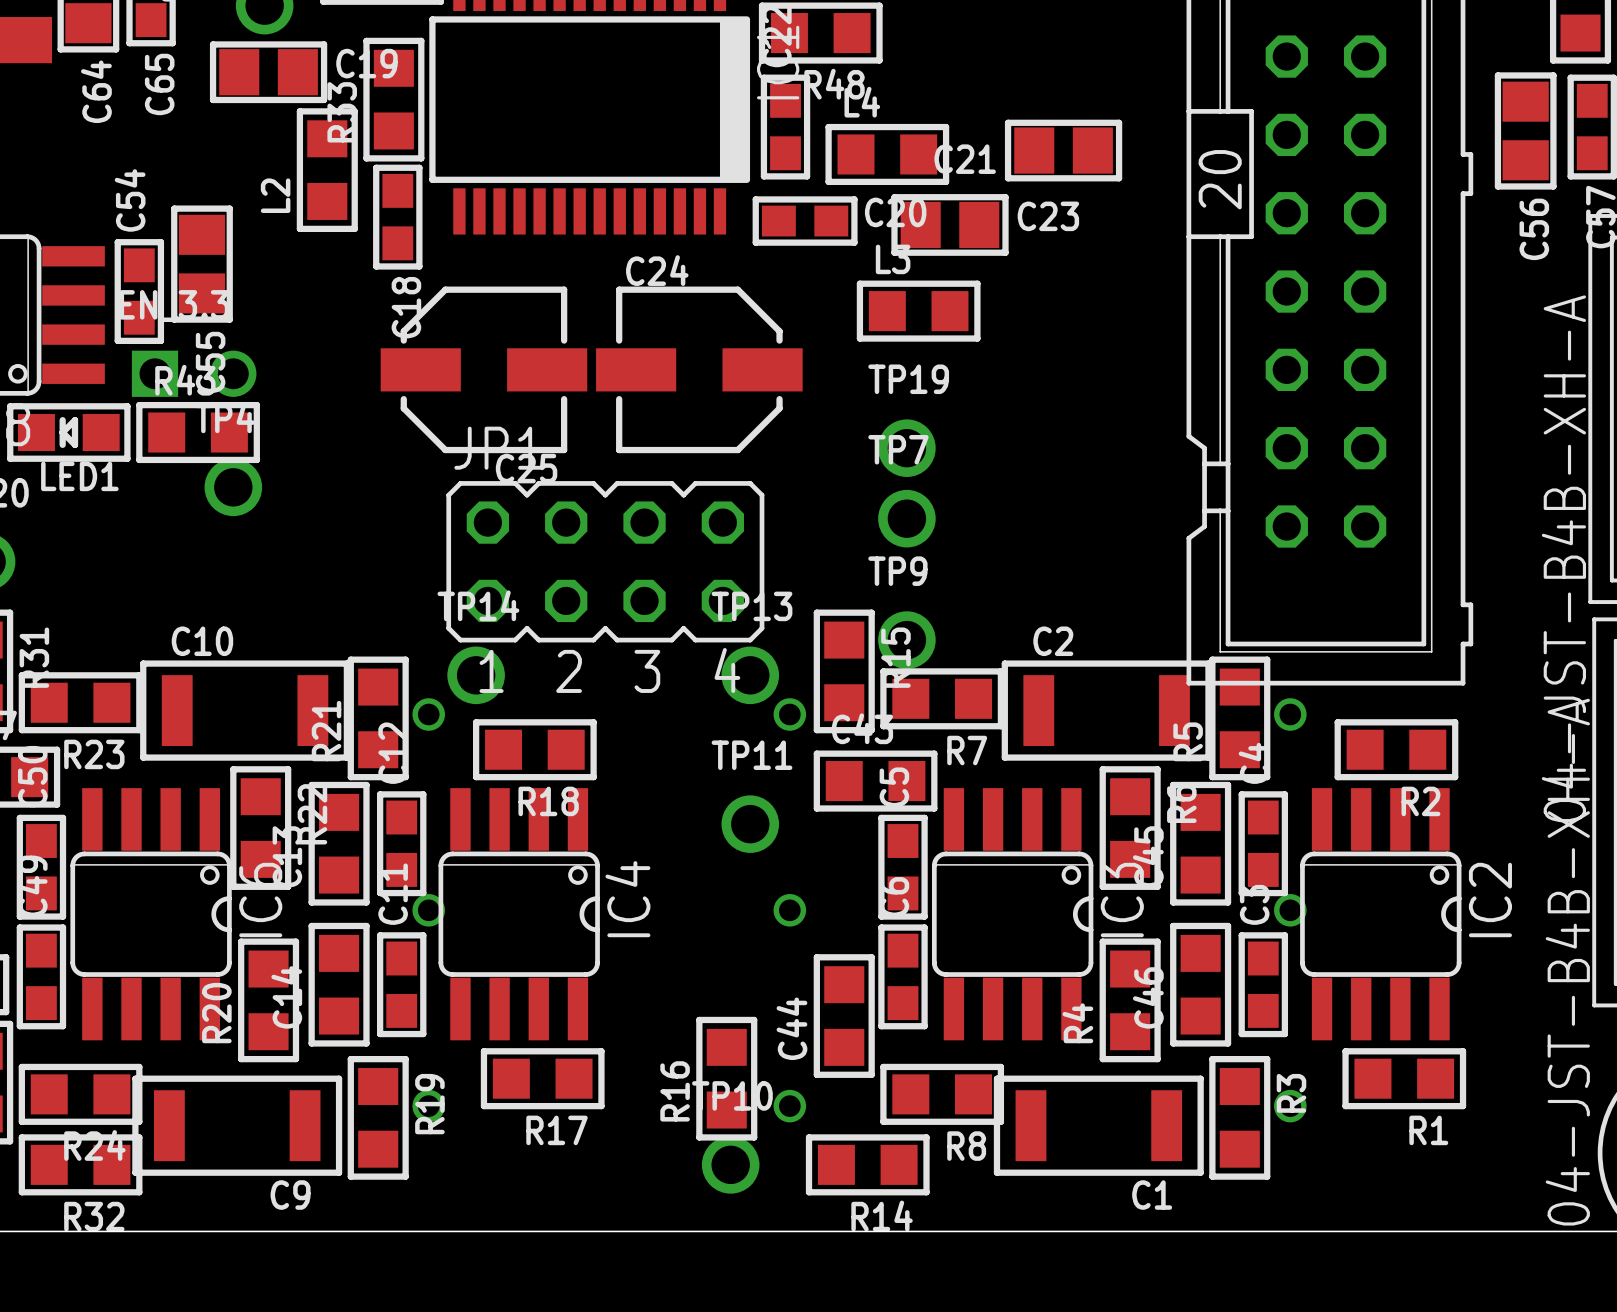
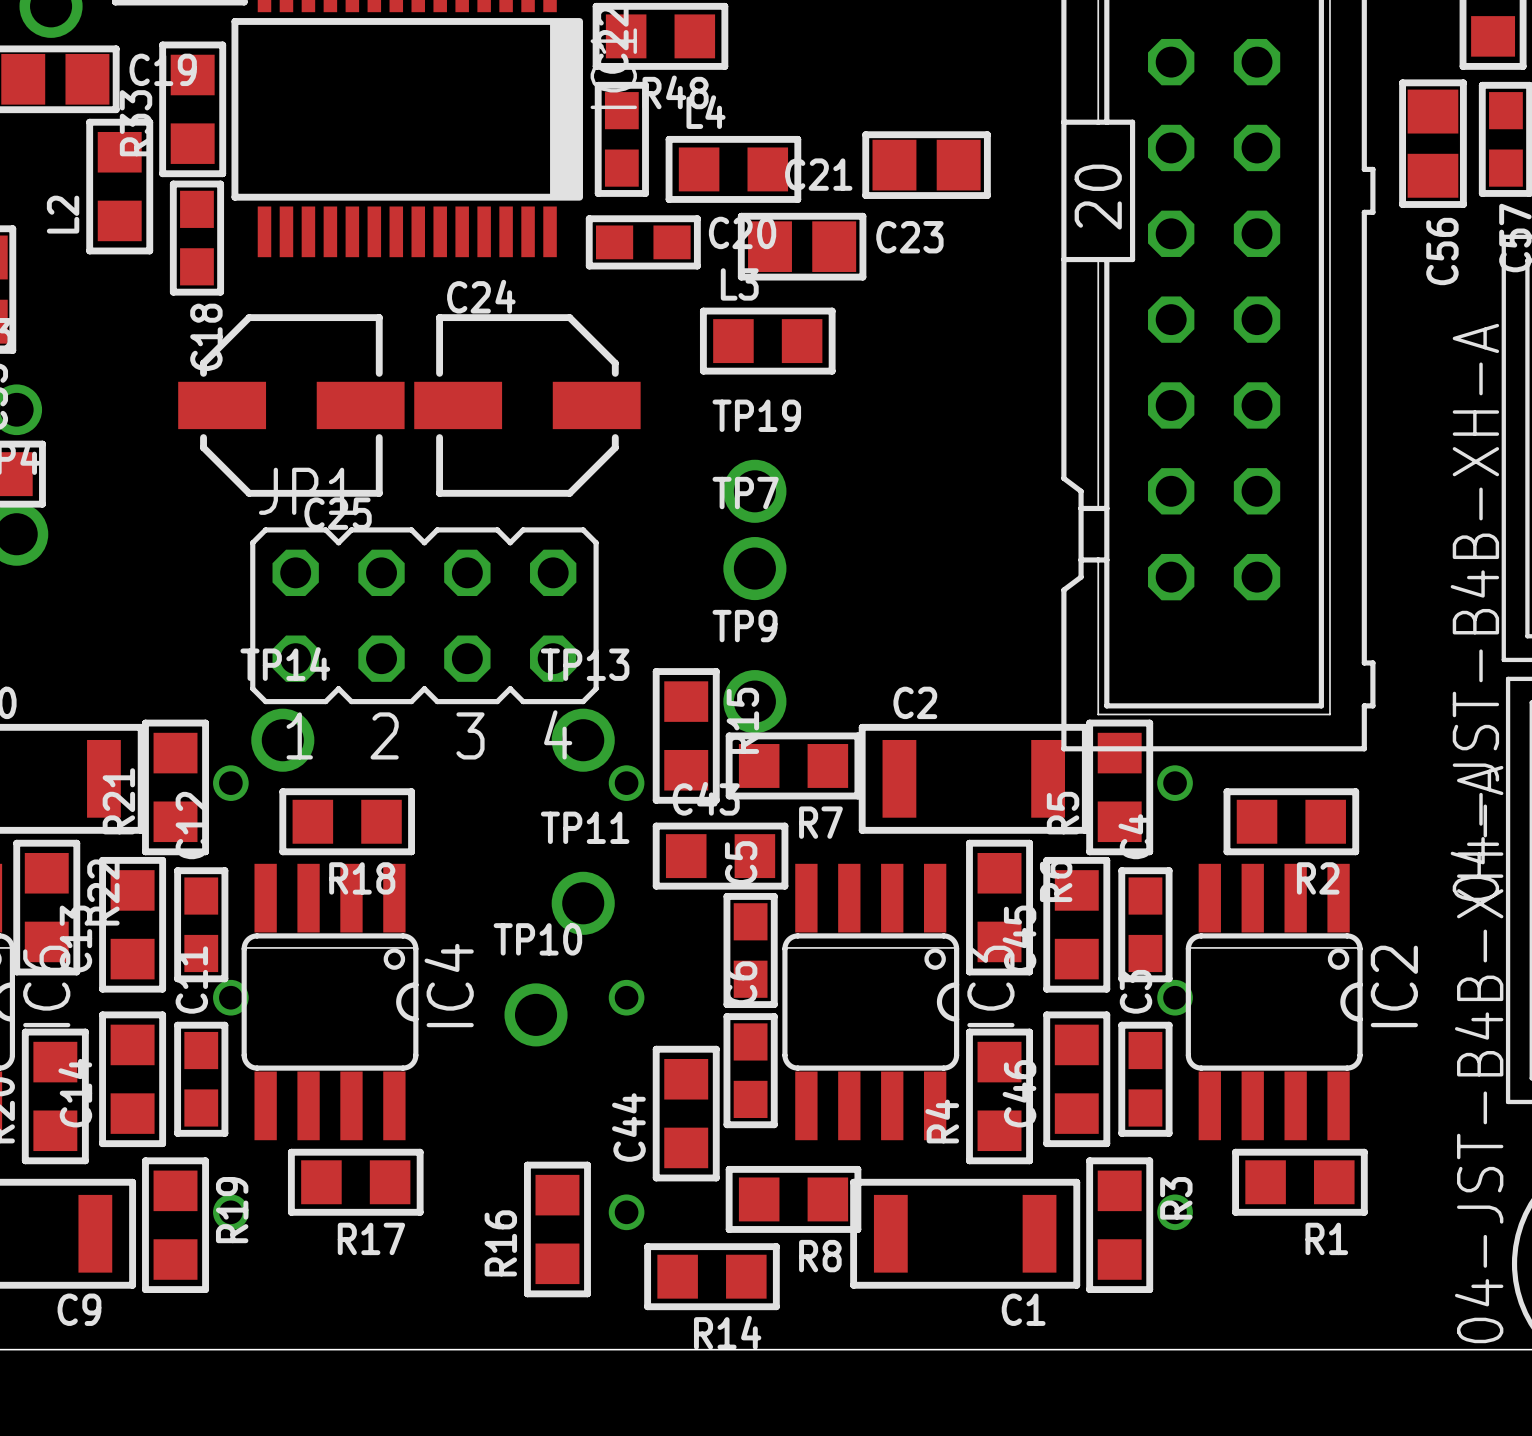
R16 position: (726, 1078) -> (557, 1229)
TP10 position: (730, 1164) -> (536, 1014)

